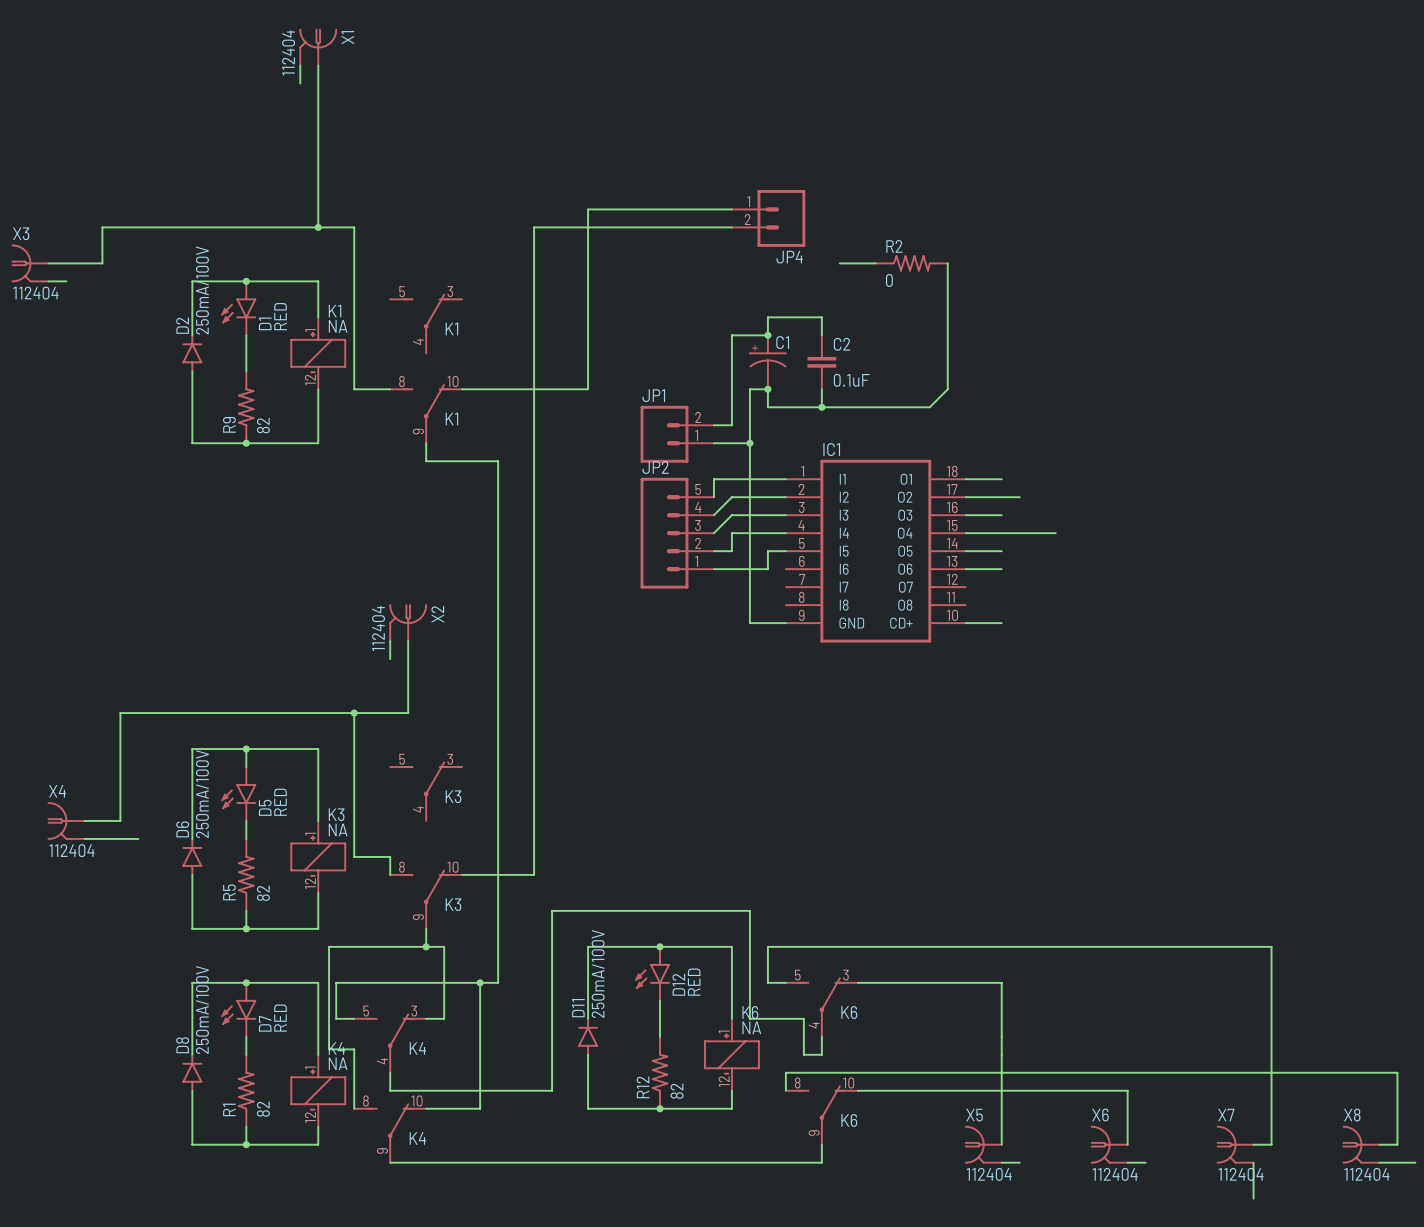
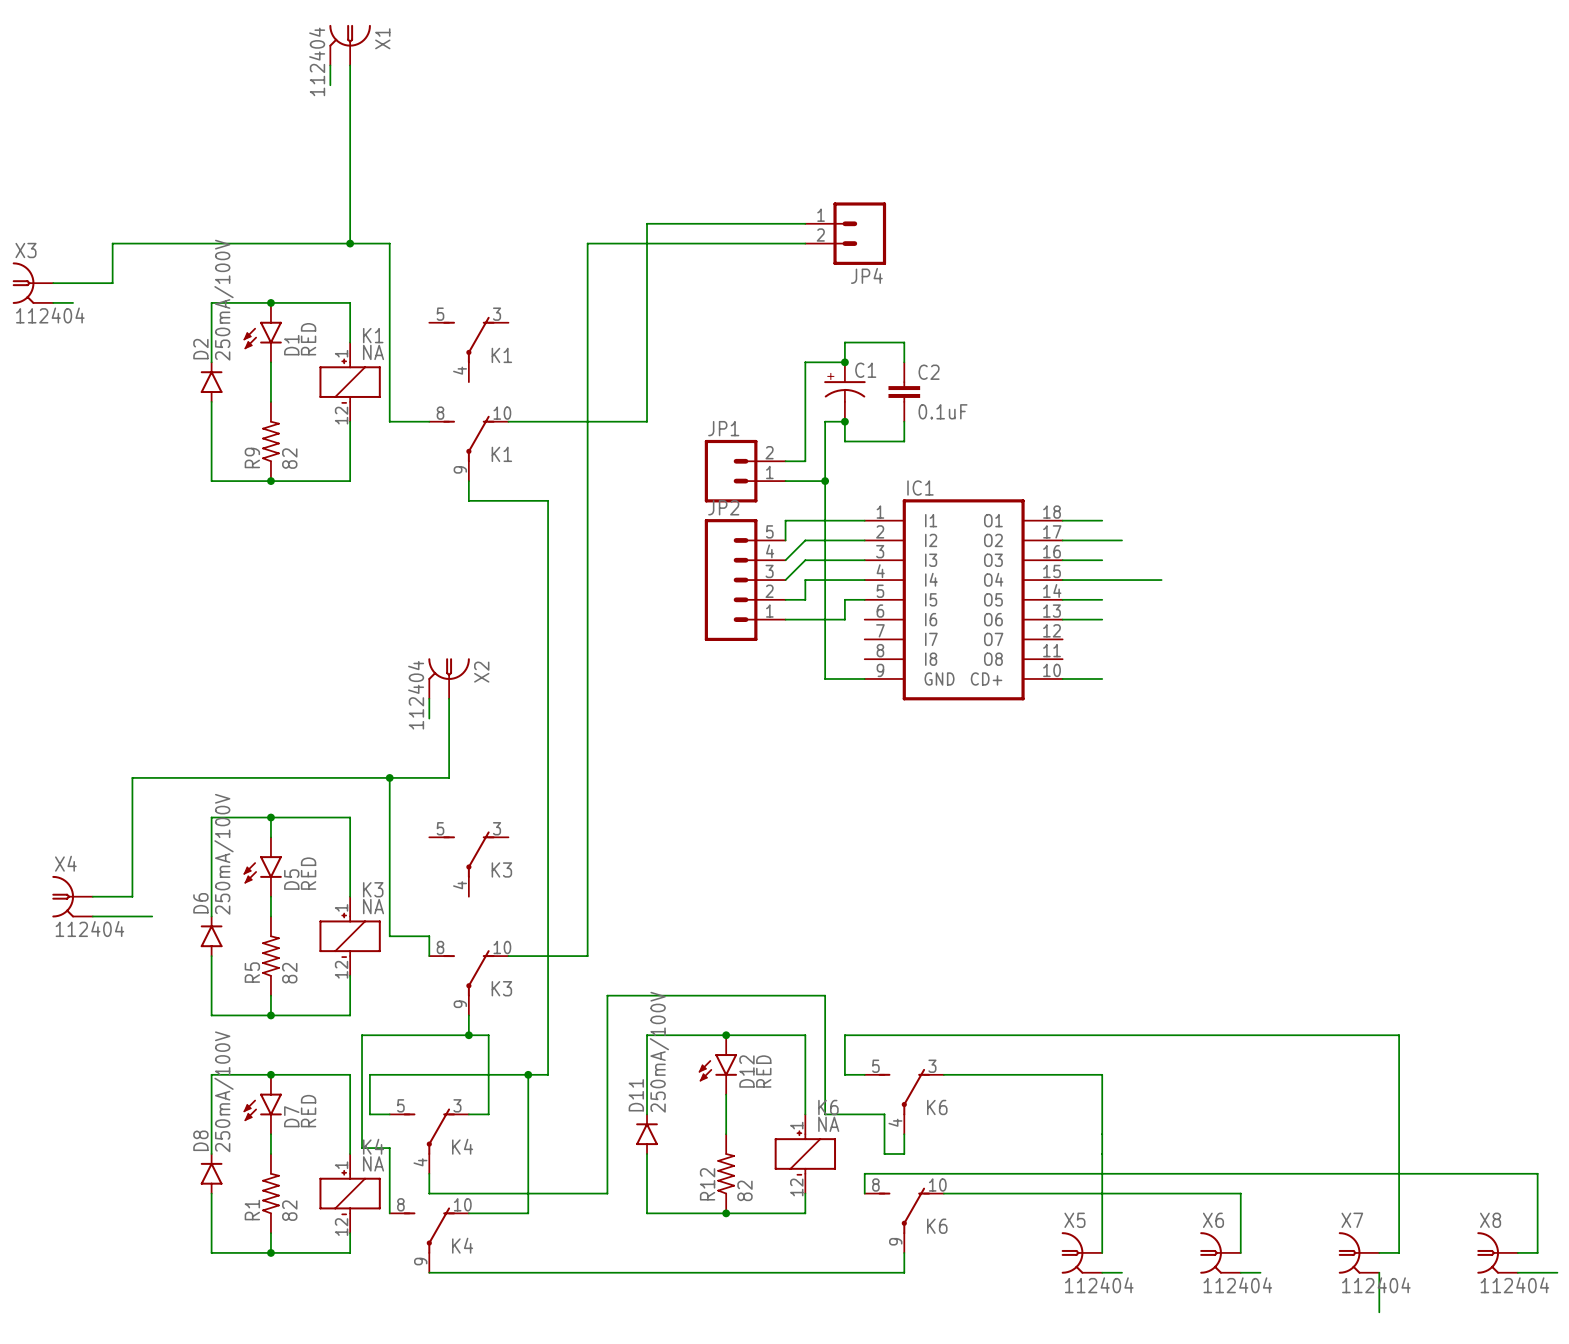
wire: (839, 263) (875, 263) -> none
R2: 0 (911, 263) -> none
wire: (947, 263) (947, 389) (929, 407) (821, 407) -> none
junction: (821, 407) -> none

